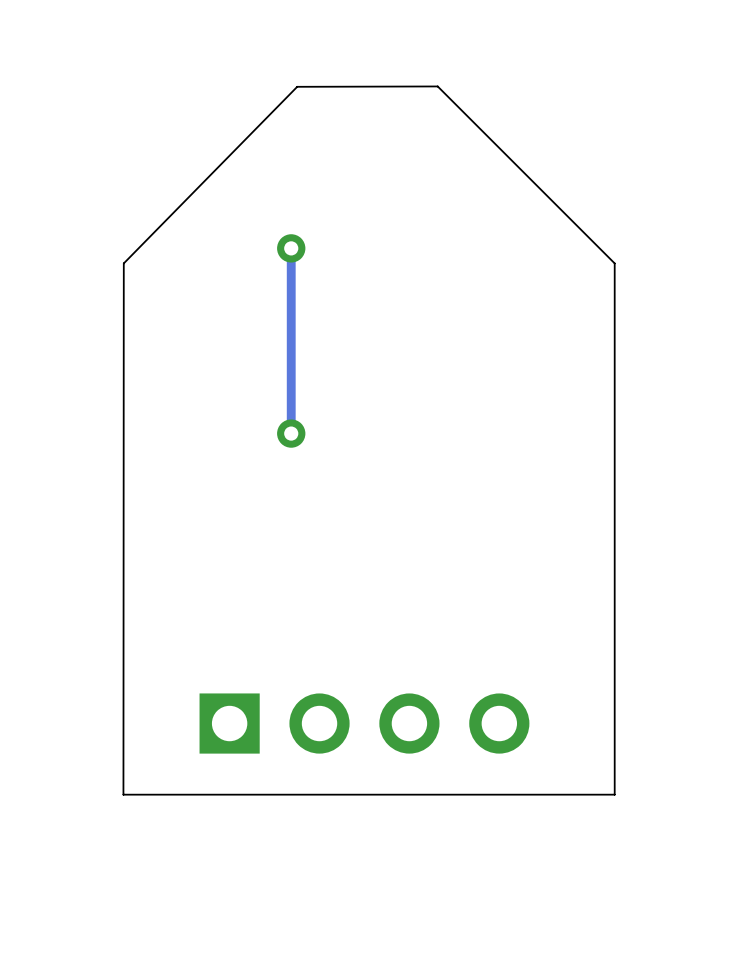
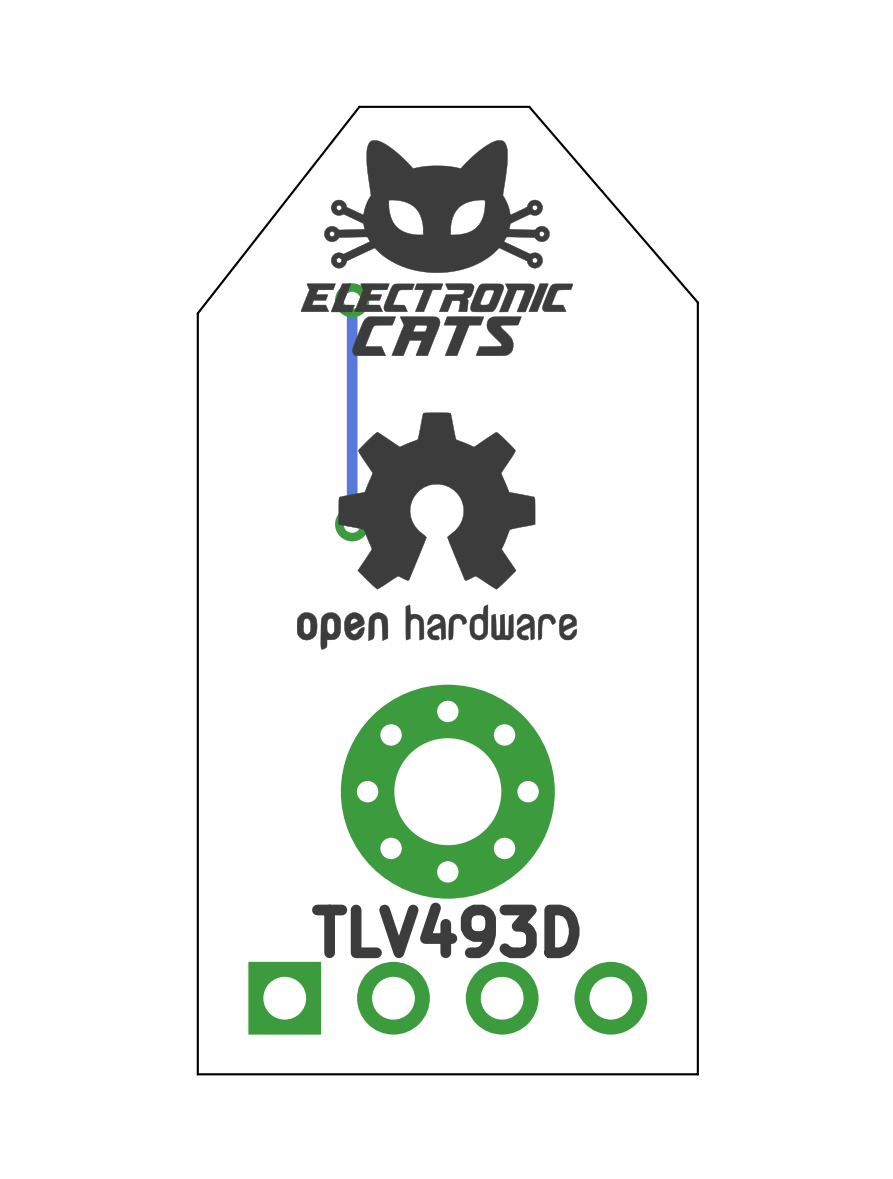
board edge: (437, 86) (614, 263) (614, 794) (123, 794) (123, 263) (297, 86) (437, 86) -> (529, 106) (697, 302) (697, 1074) (197, 1074) (197, 313) (359, 106) (529, 106)
drawing: none -> [300, 140, 574, 357]
drawing: none -> [296, 412, 577, 650]
part: none -> (447, 791)
part position: (364, 723) -> (447, 998)
text: none -> TLV493D (445, 930)

